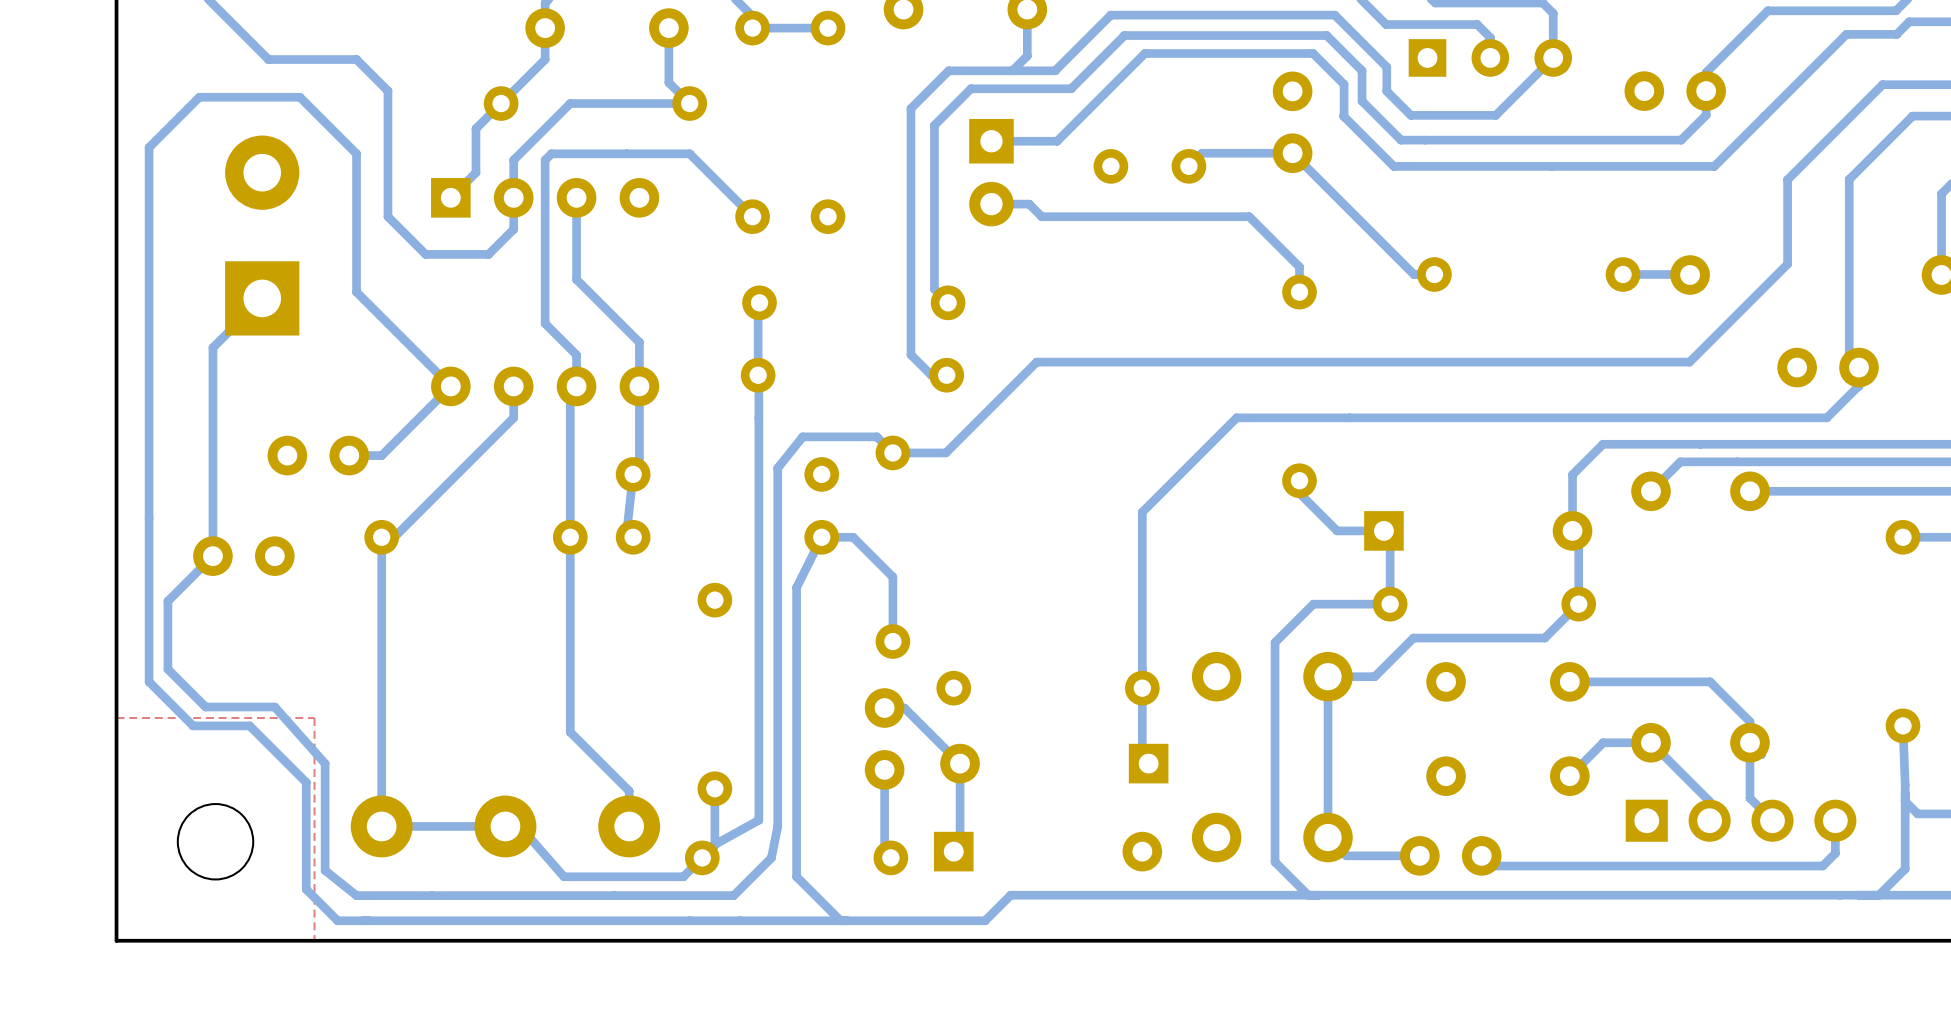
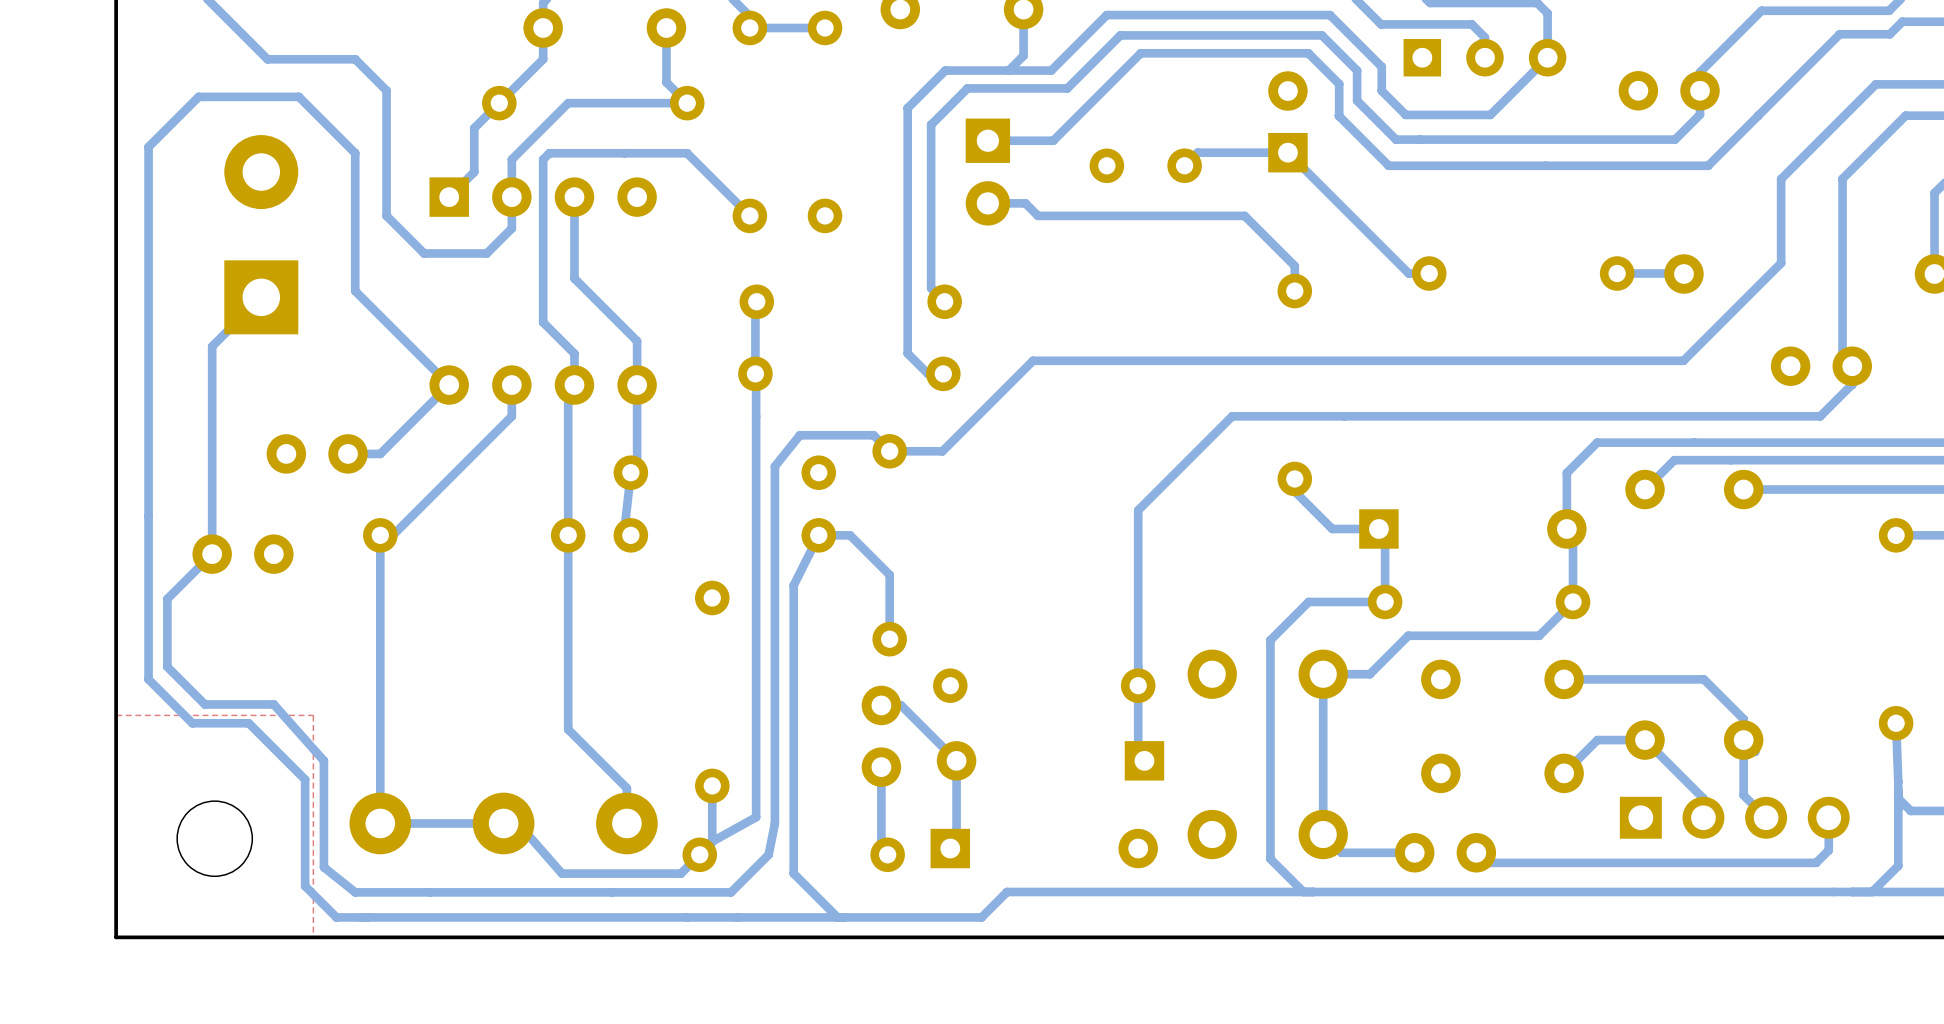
part footprint: [1272, 71, 1313, 174] -> [1268, 71, 1308, 173]

